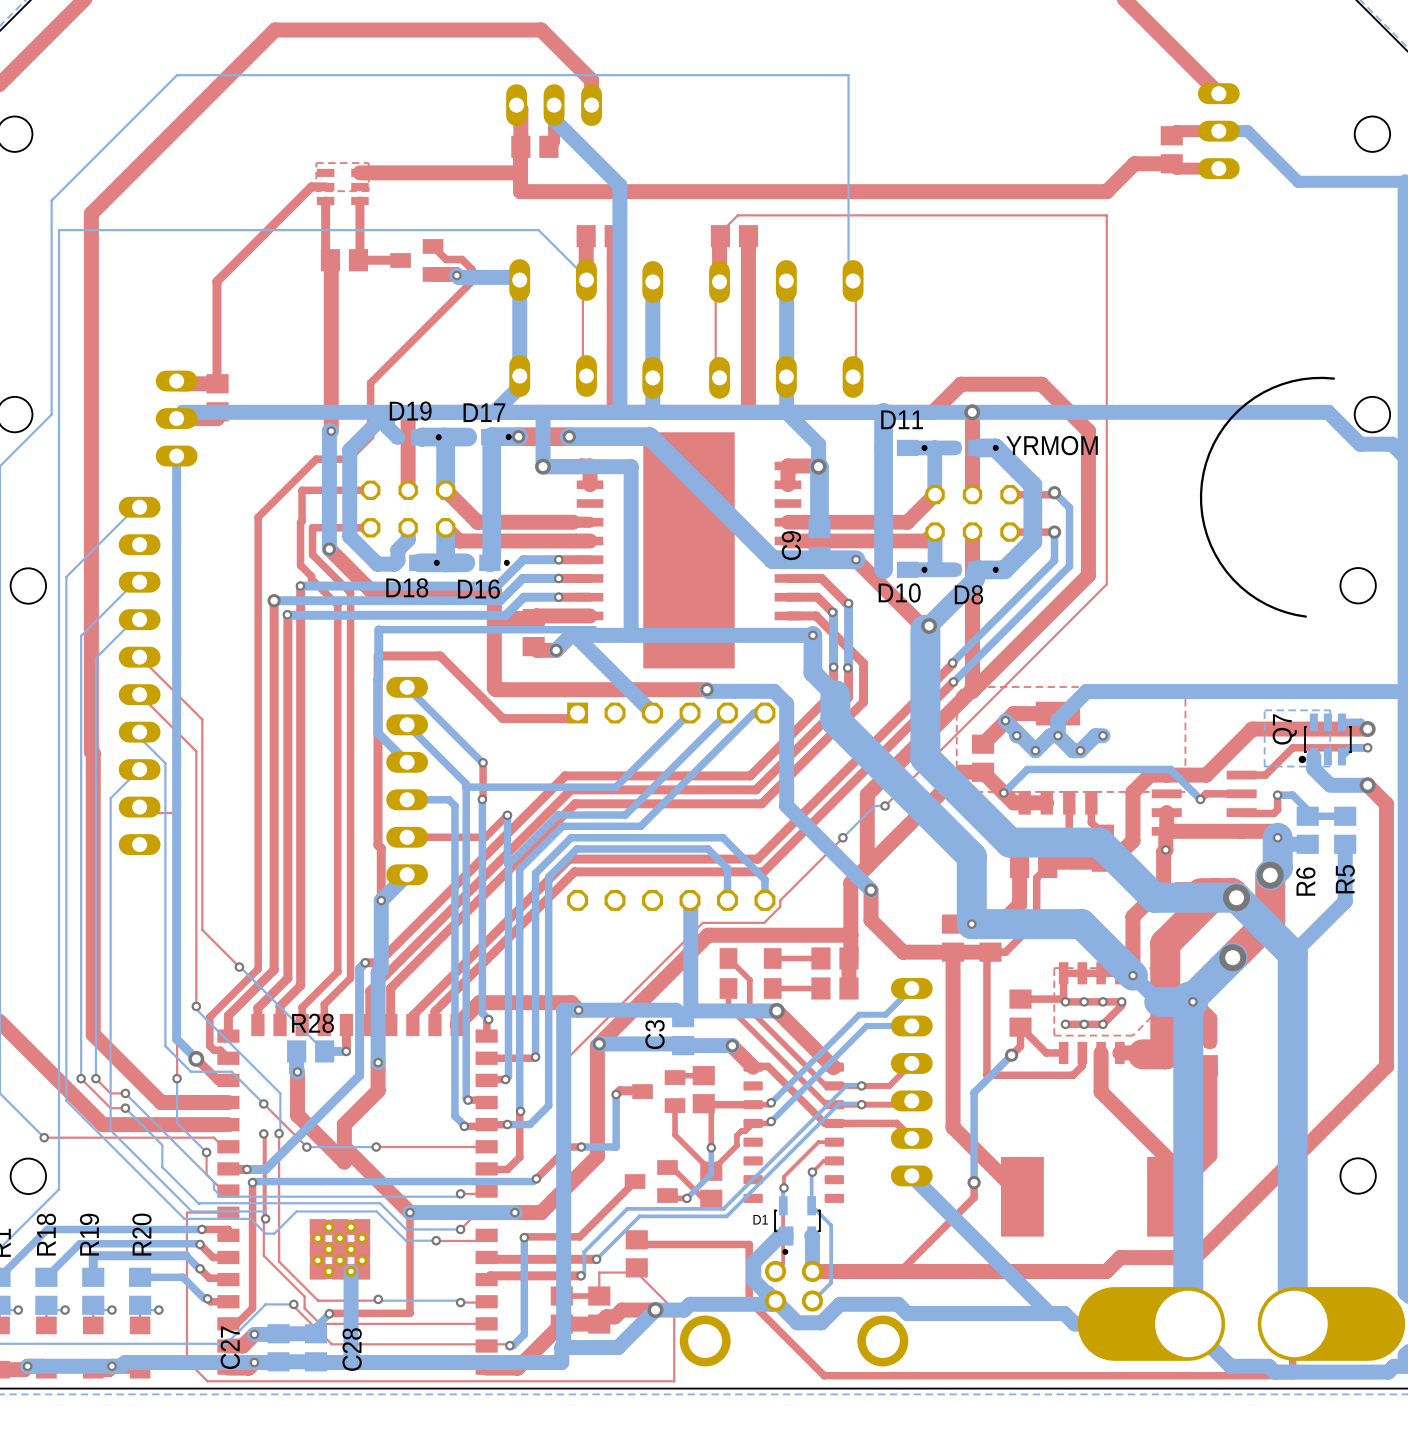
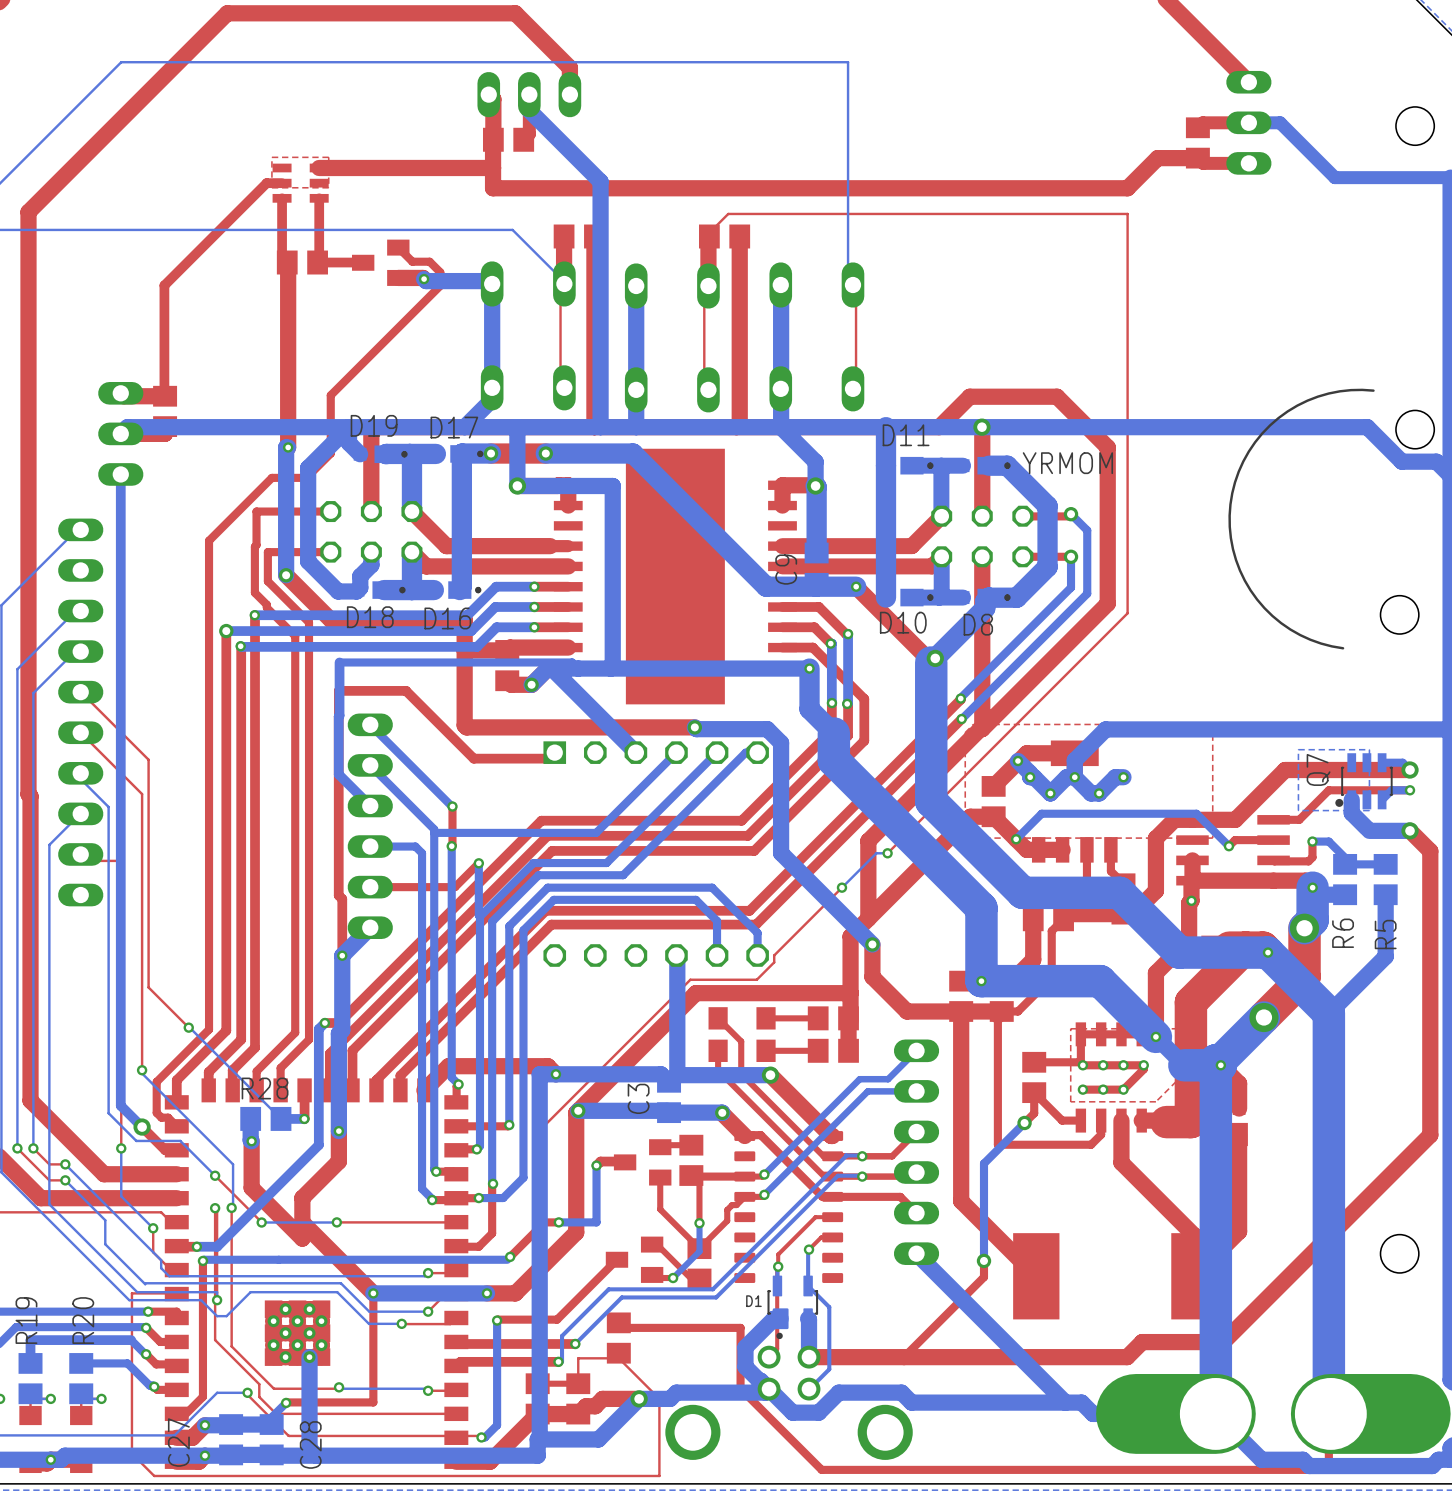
via size: [1223, 884, 1250, 912] -> [1262, 947, 1274, 958]

